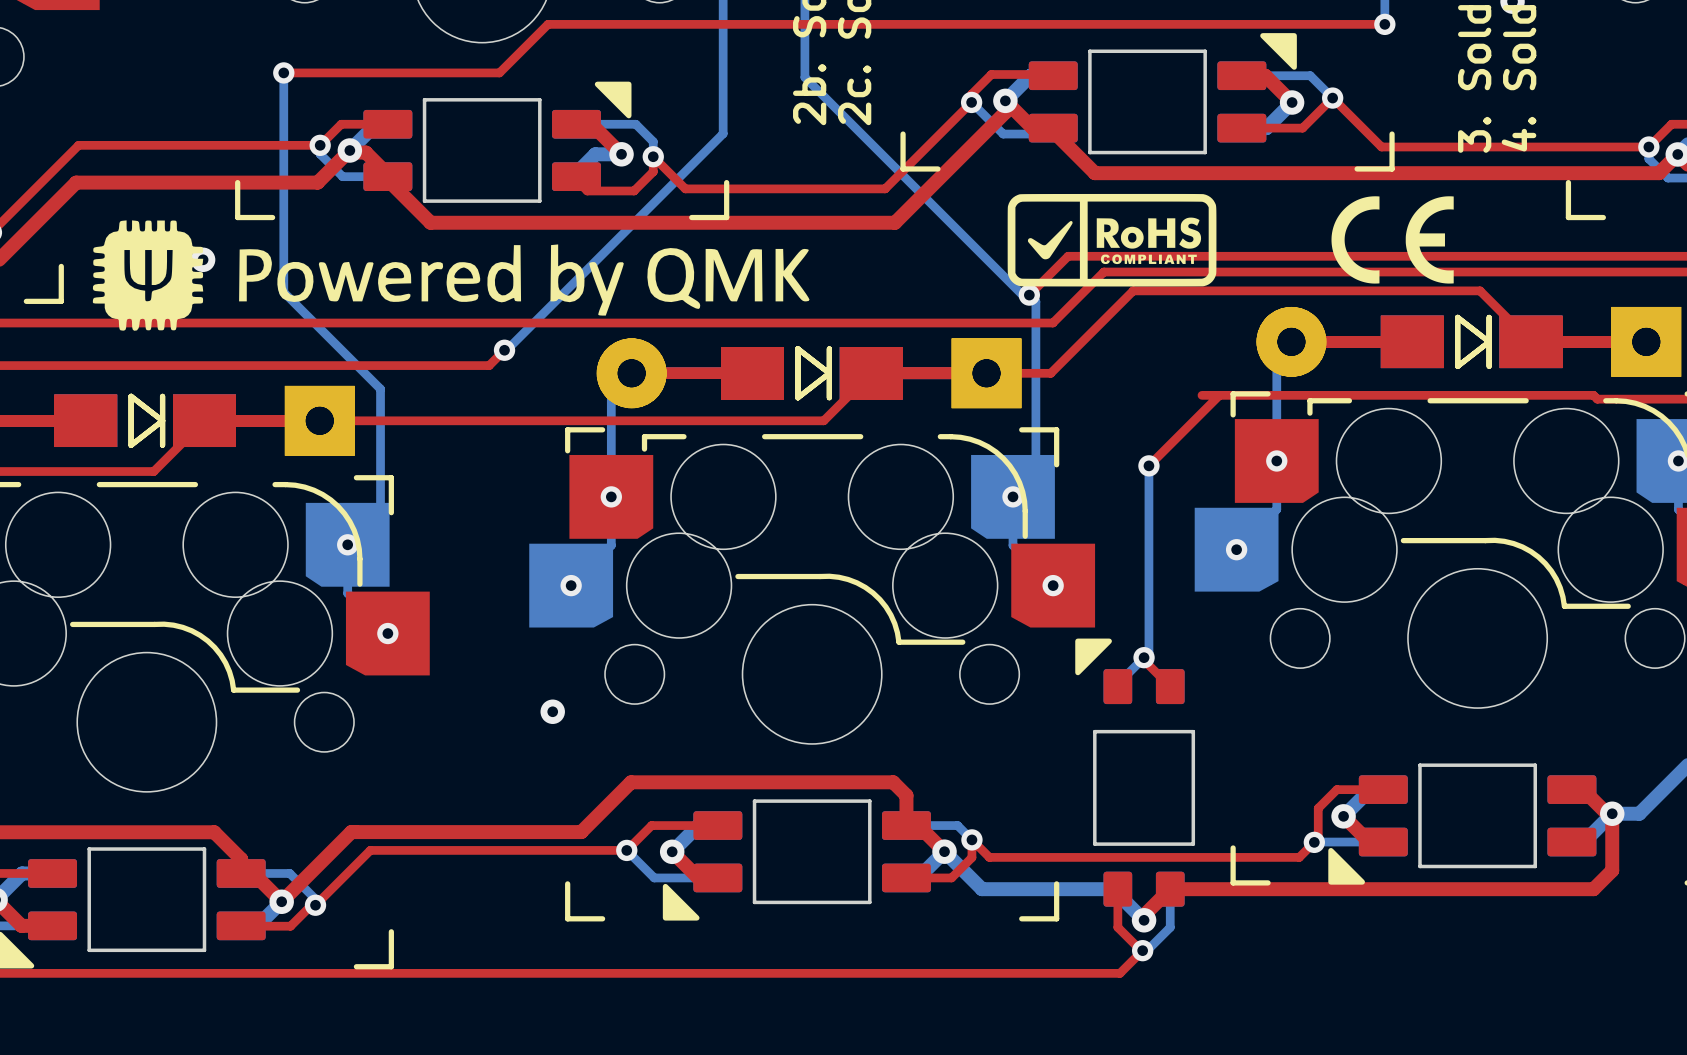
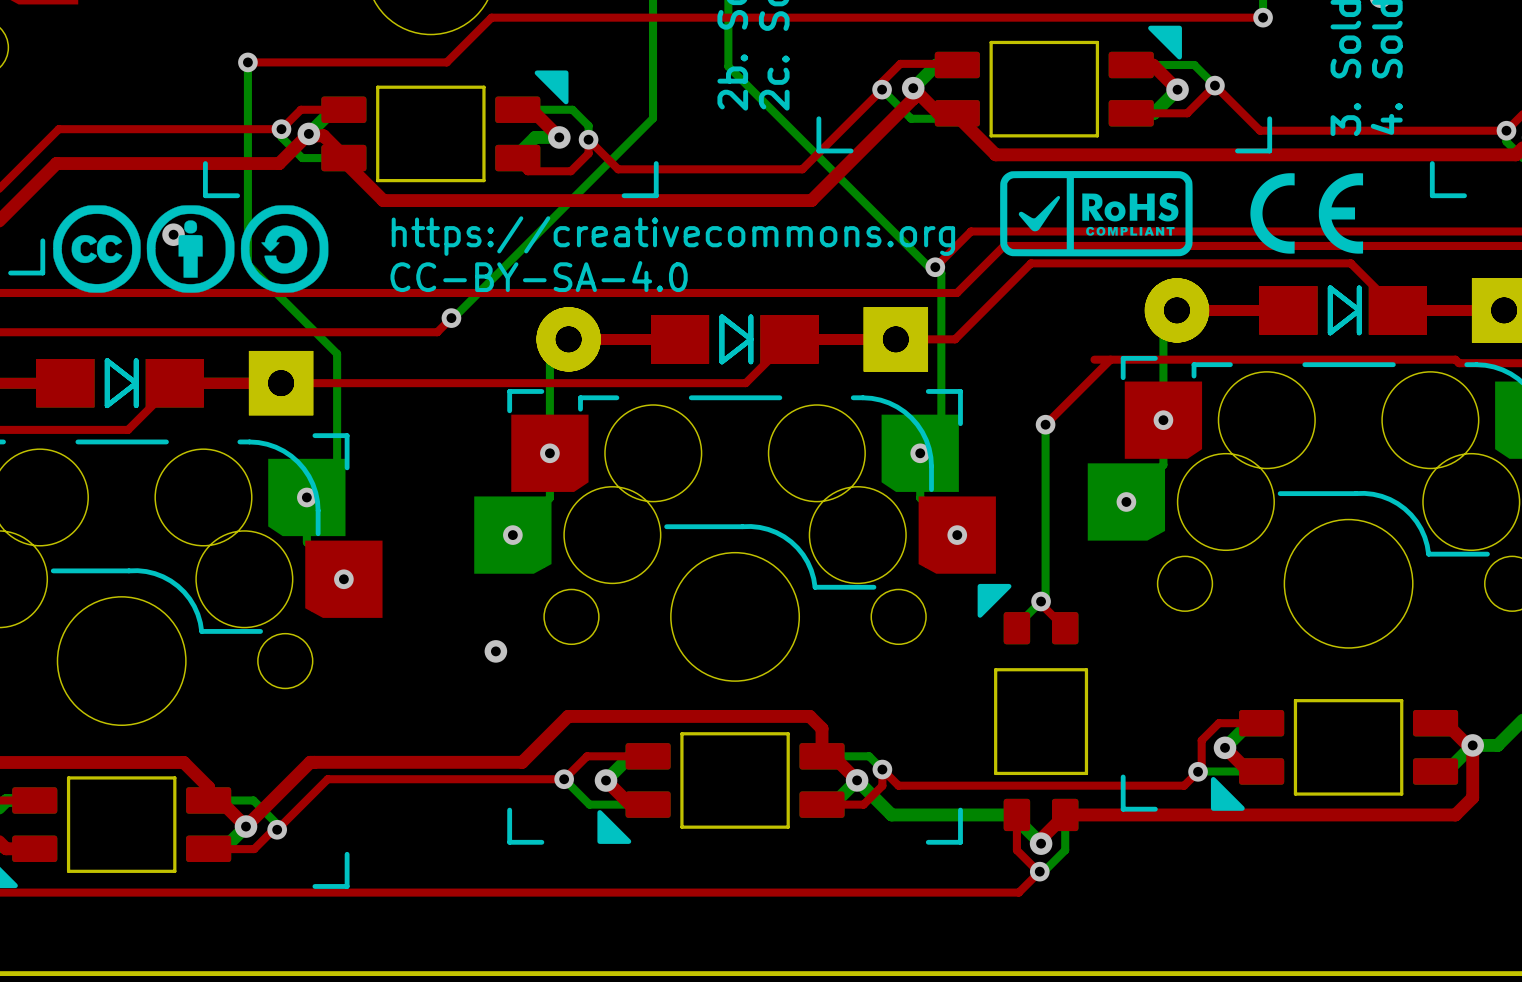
drawing: [92, 220, 810, 331] -> none
drawing: none -> [53, 205, 329, 293]
drawing position: (1392, 239) -> (1306, 213)
drawing position: (1112, 240) -> (1096, 213)

